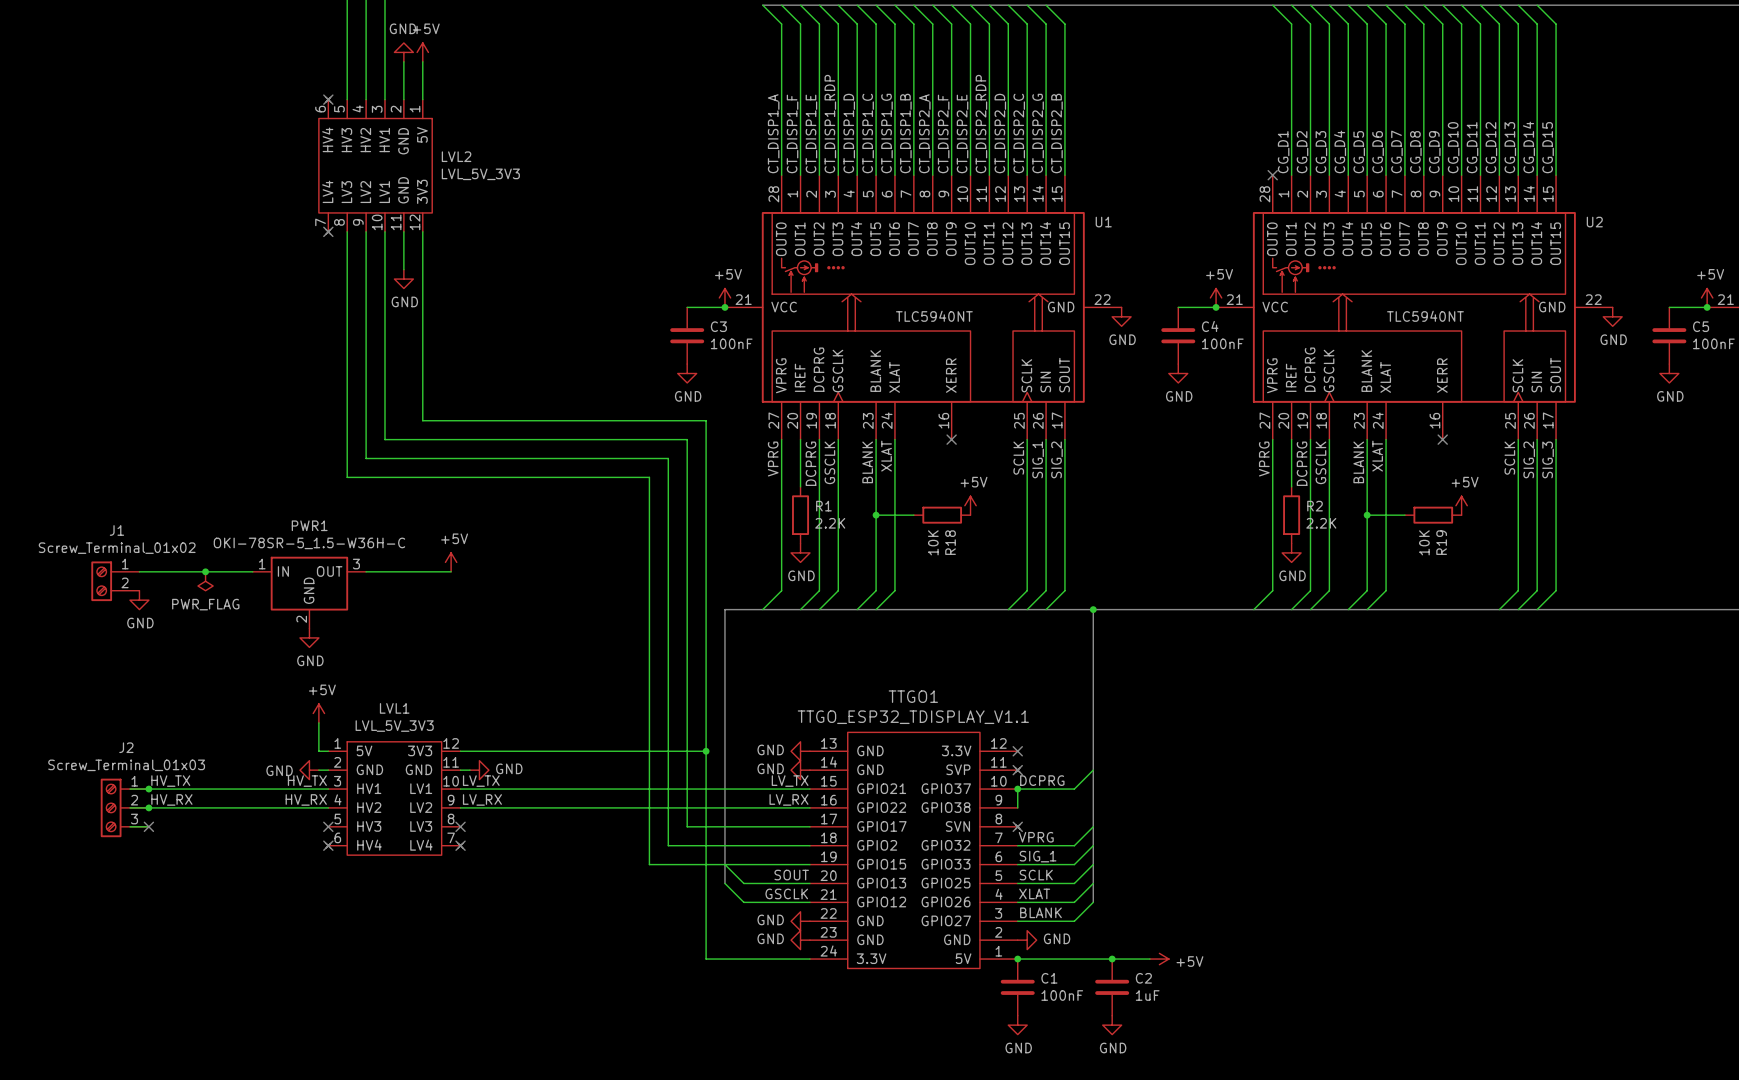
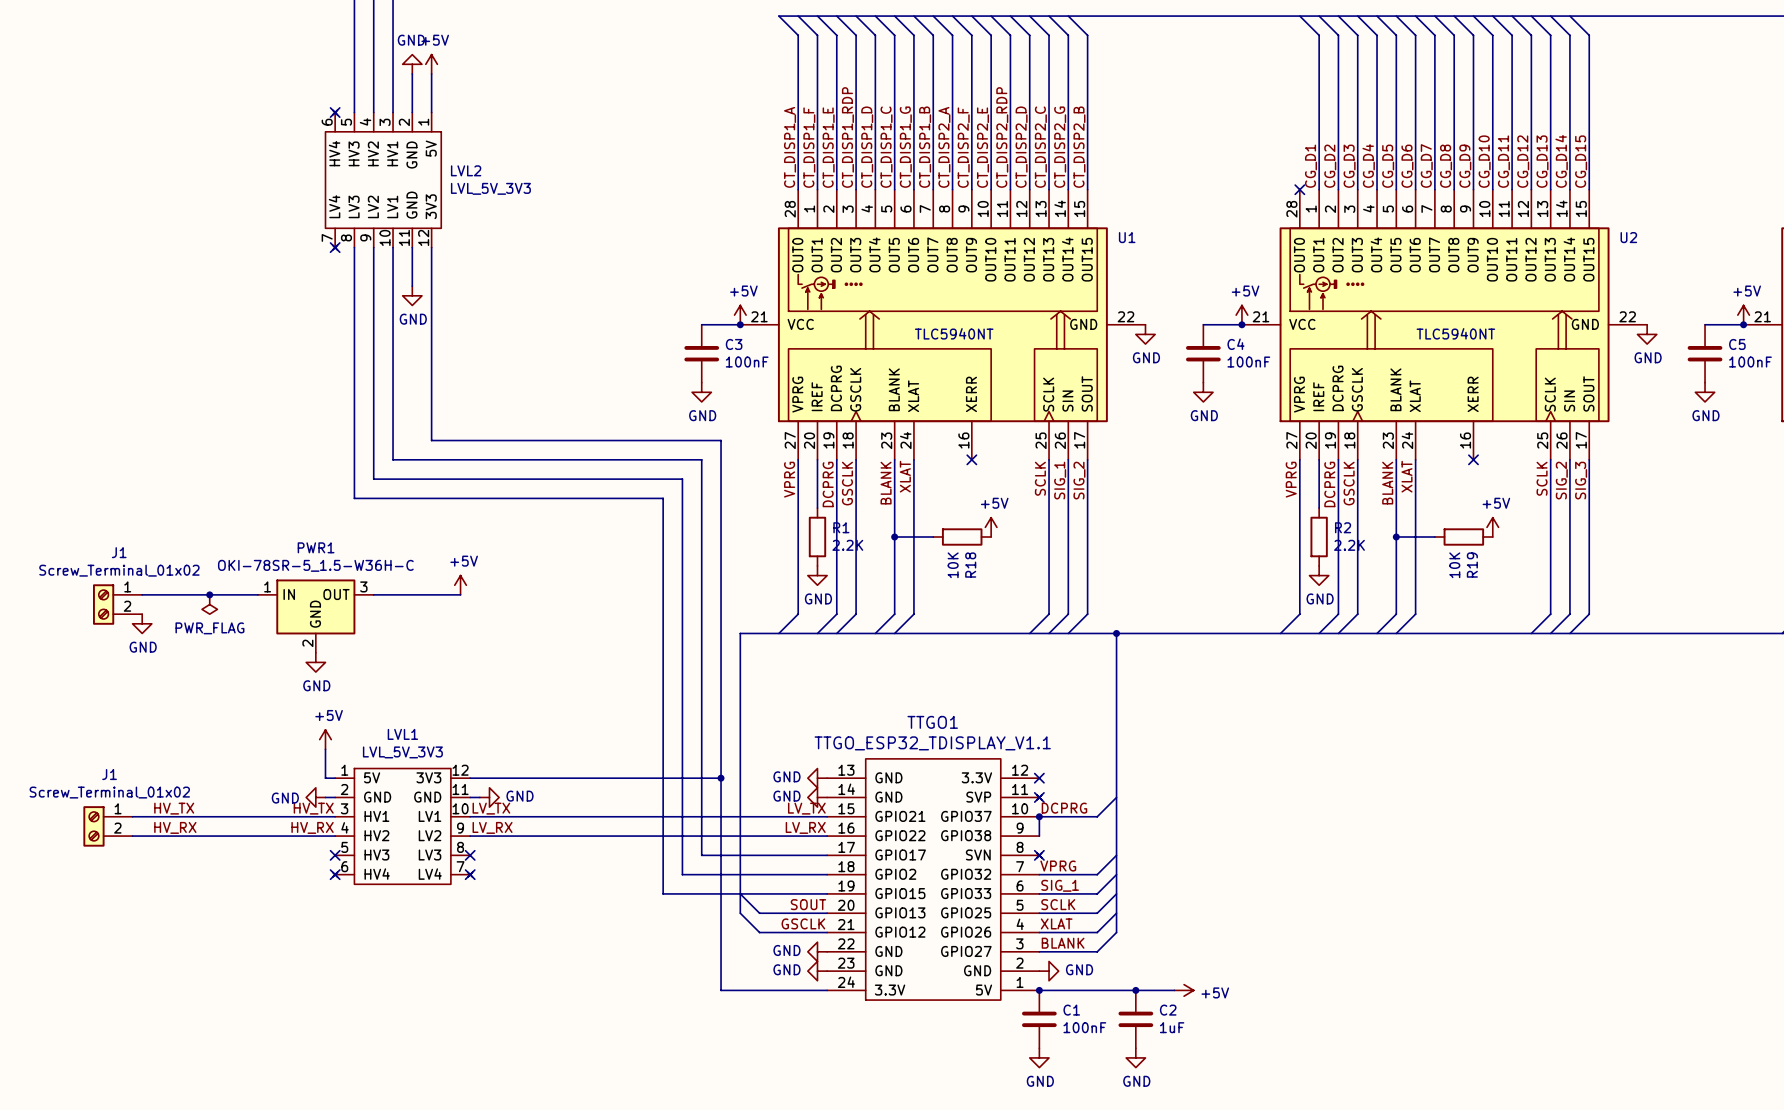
junction: (148, 789) -> none
J1: none -> Screw_Terminal_01x02 (107, 826)
J2: Screw_Terminal_01x03 (124, 807) -> none
junction: (148, 807) -> none
wire: (130, 826) (148, 826) -> none
no-connect mark: (148, 826) -> none

